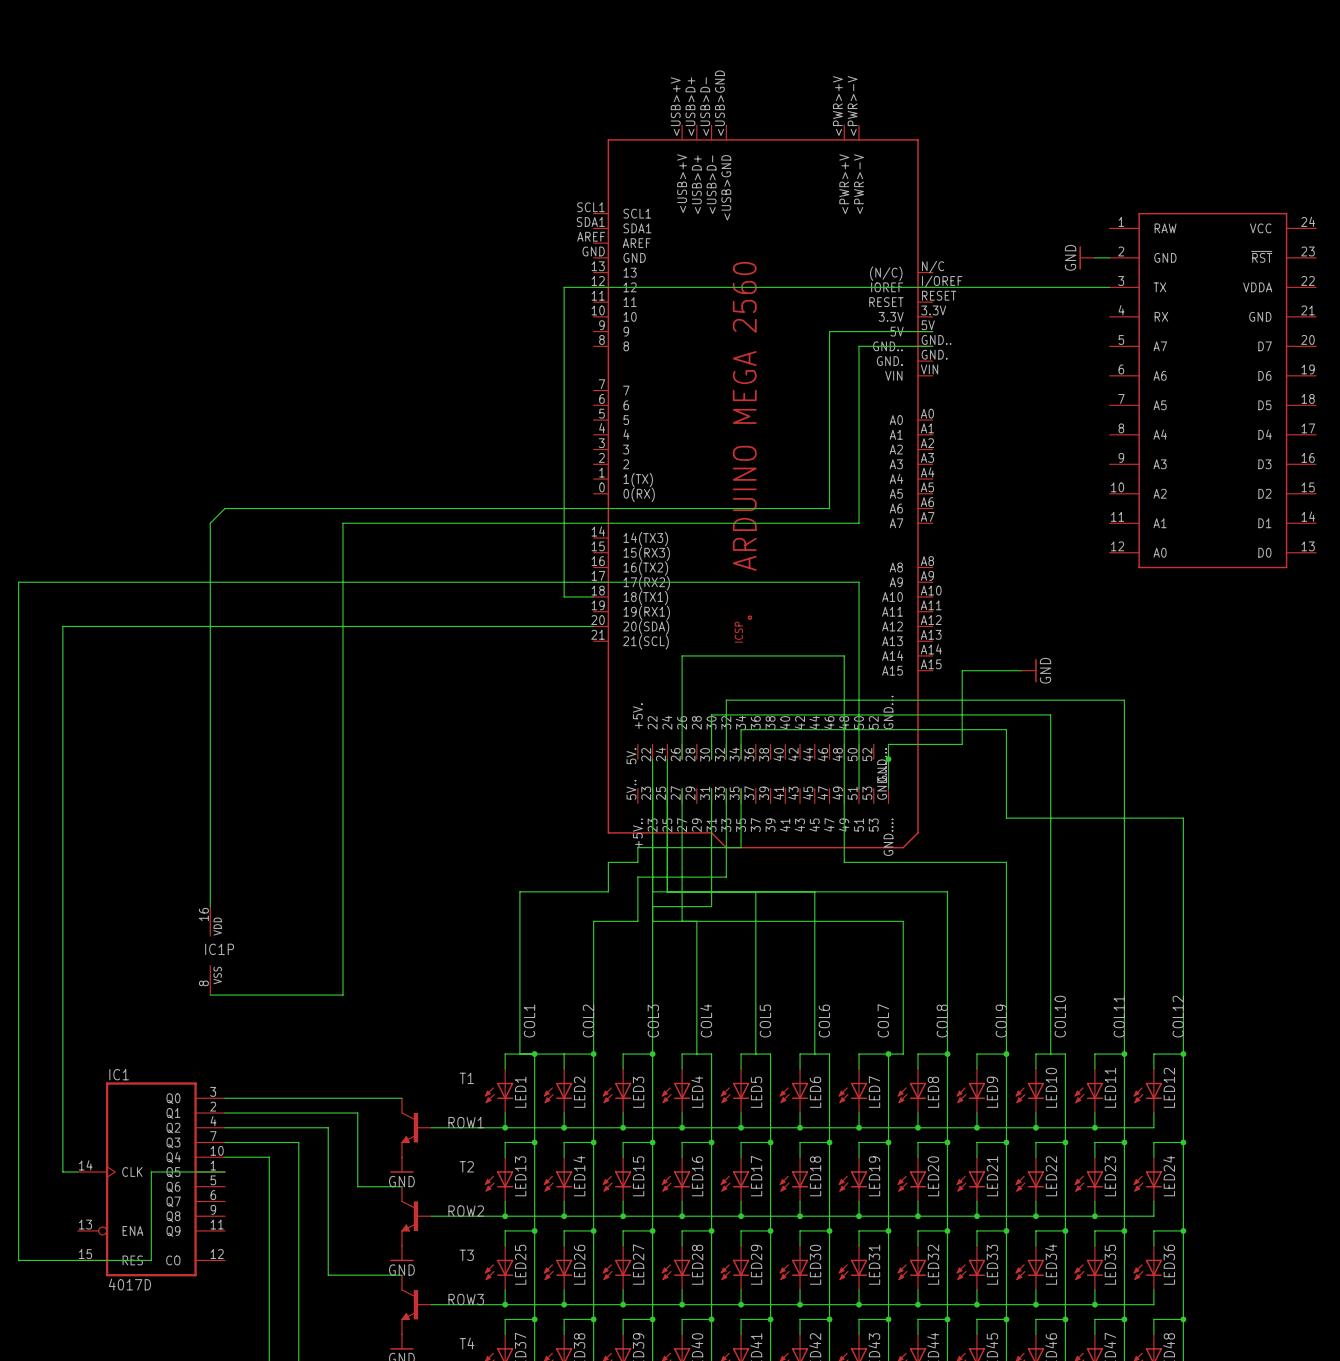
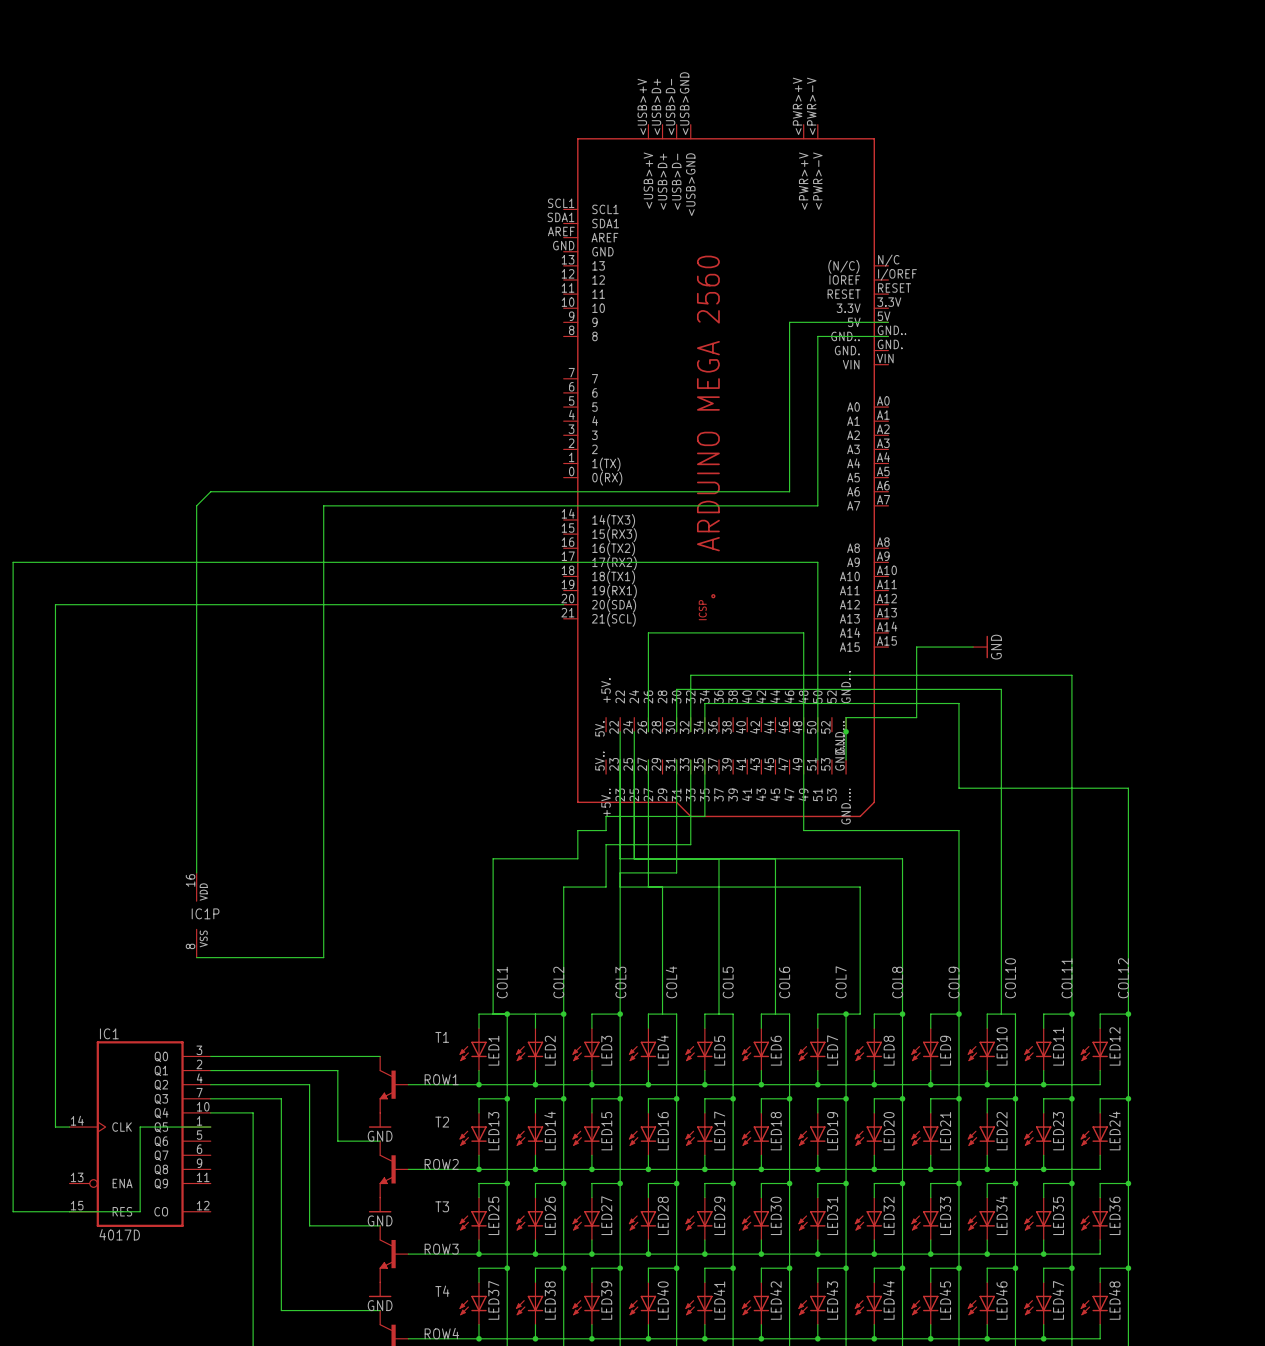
power symbol: GND (1087, 257) -> none
wire: (1094, 257) (1109, 257) -> none
wire: (1109, 287) (564, 287) (564, 596) (593, 596) -> none
part: (1212, 390) -> none

